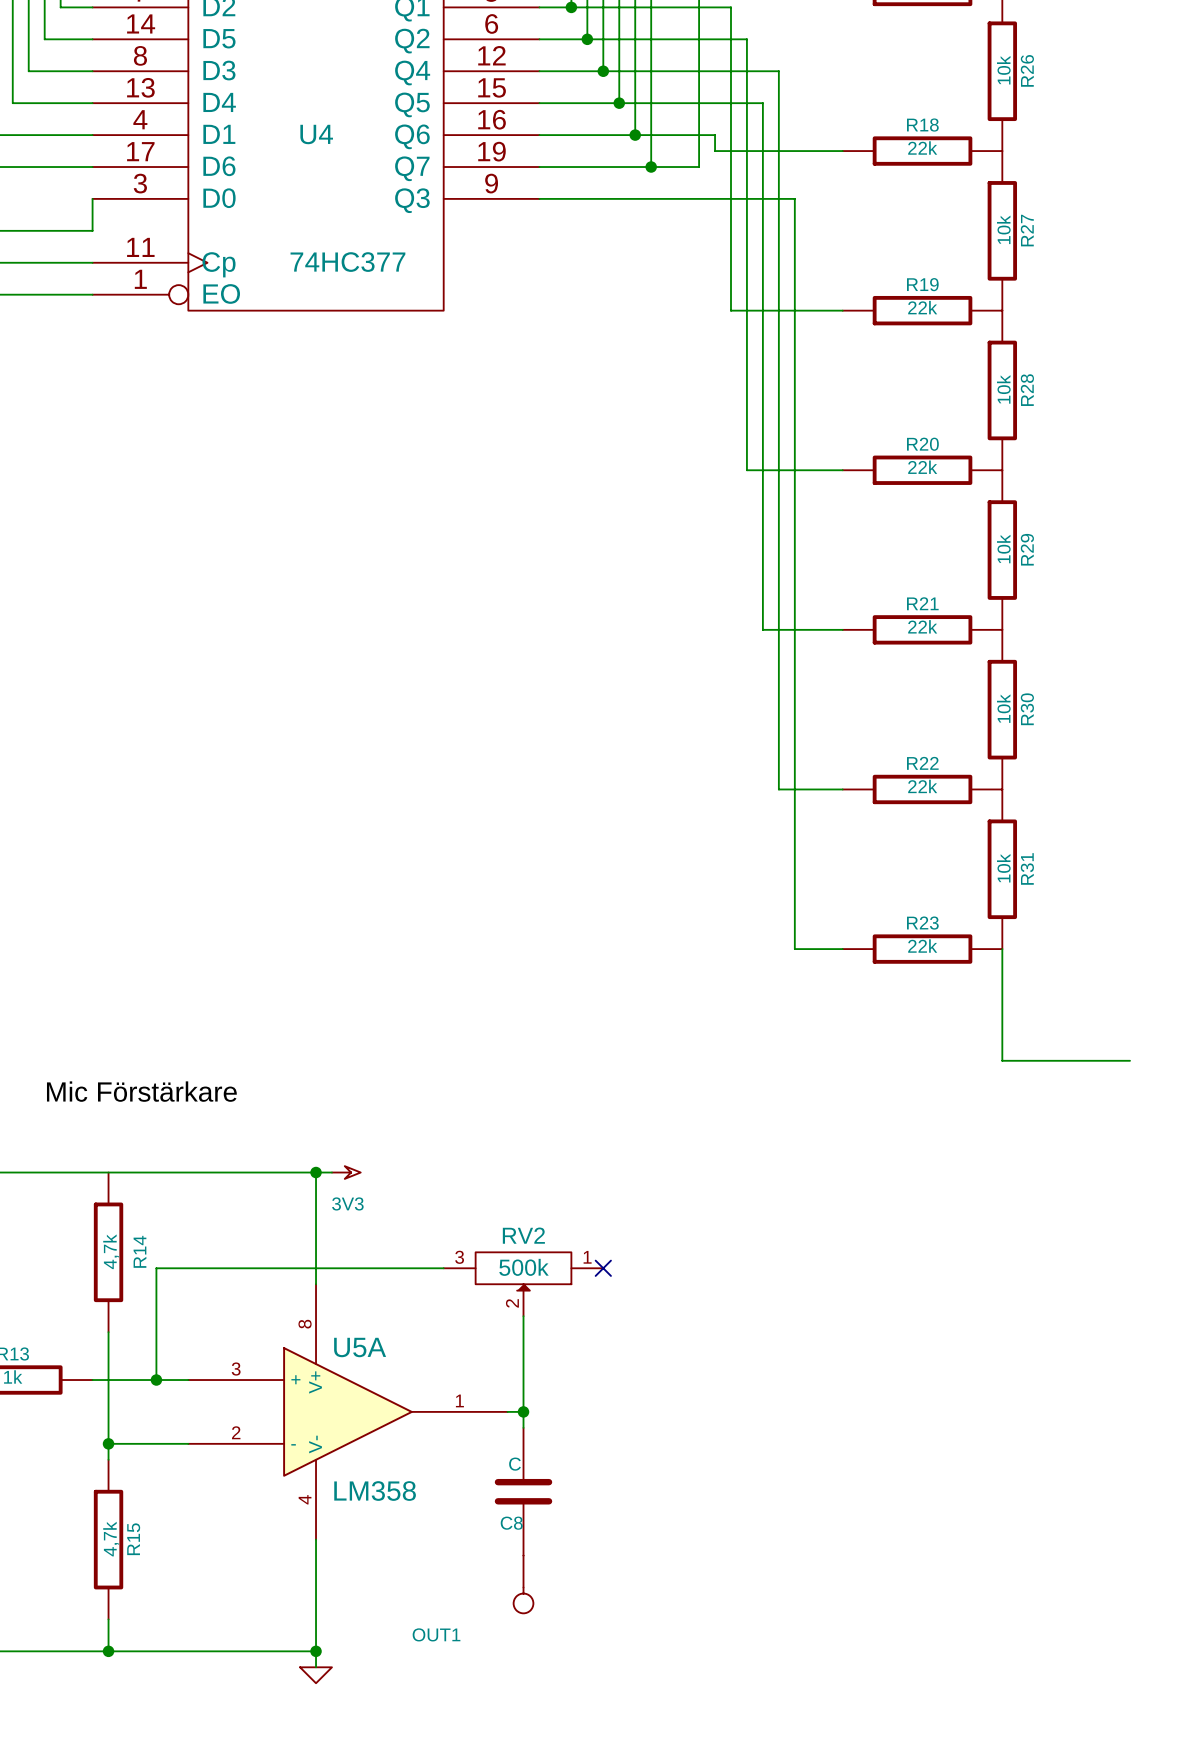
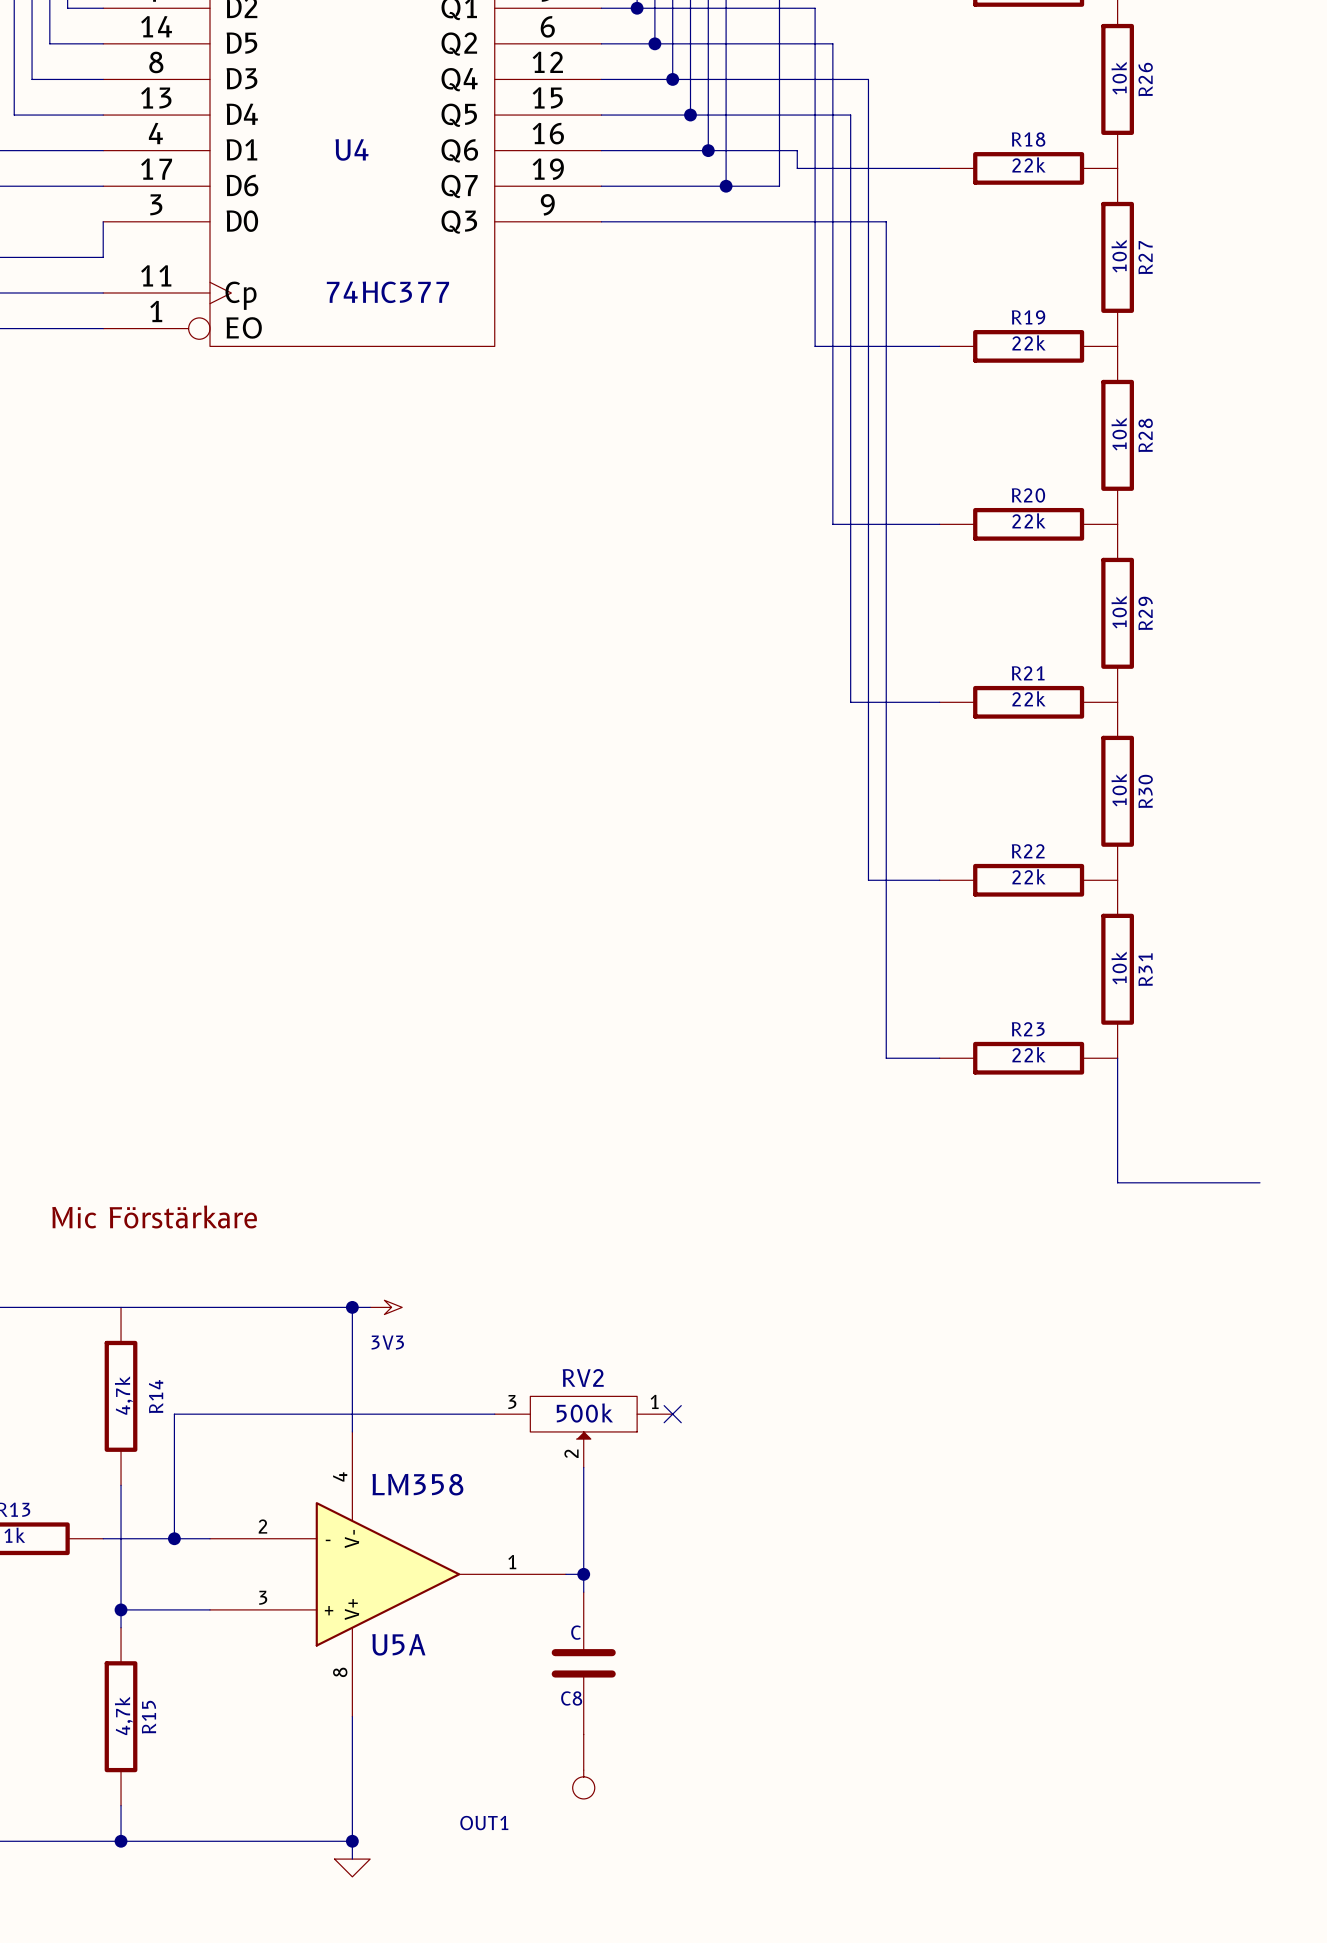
U5A flip: as is (347, 1411) -> up-down (387, 1574)

